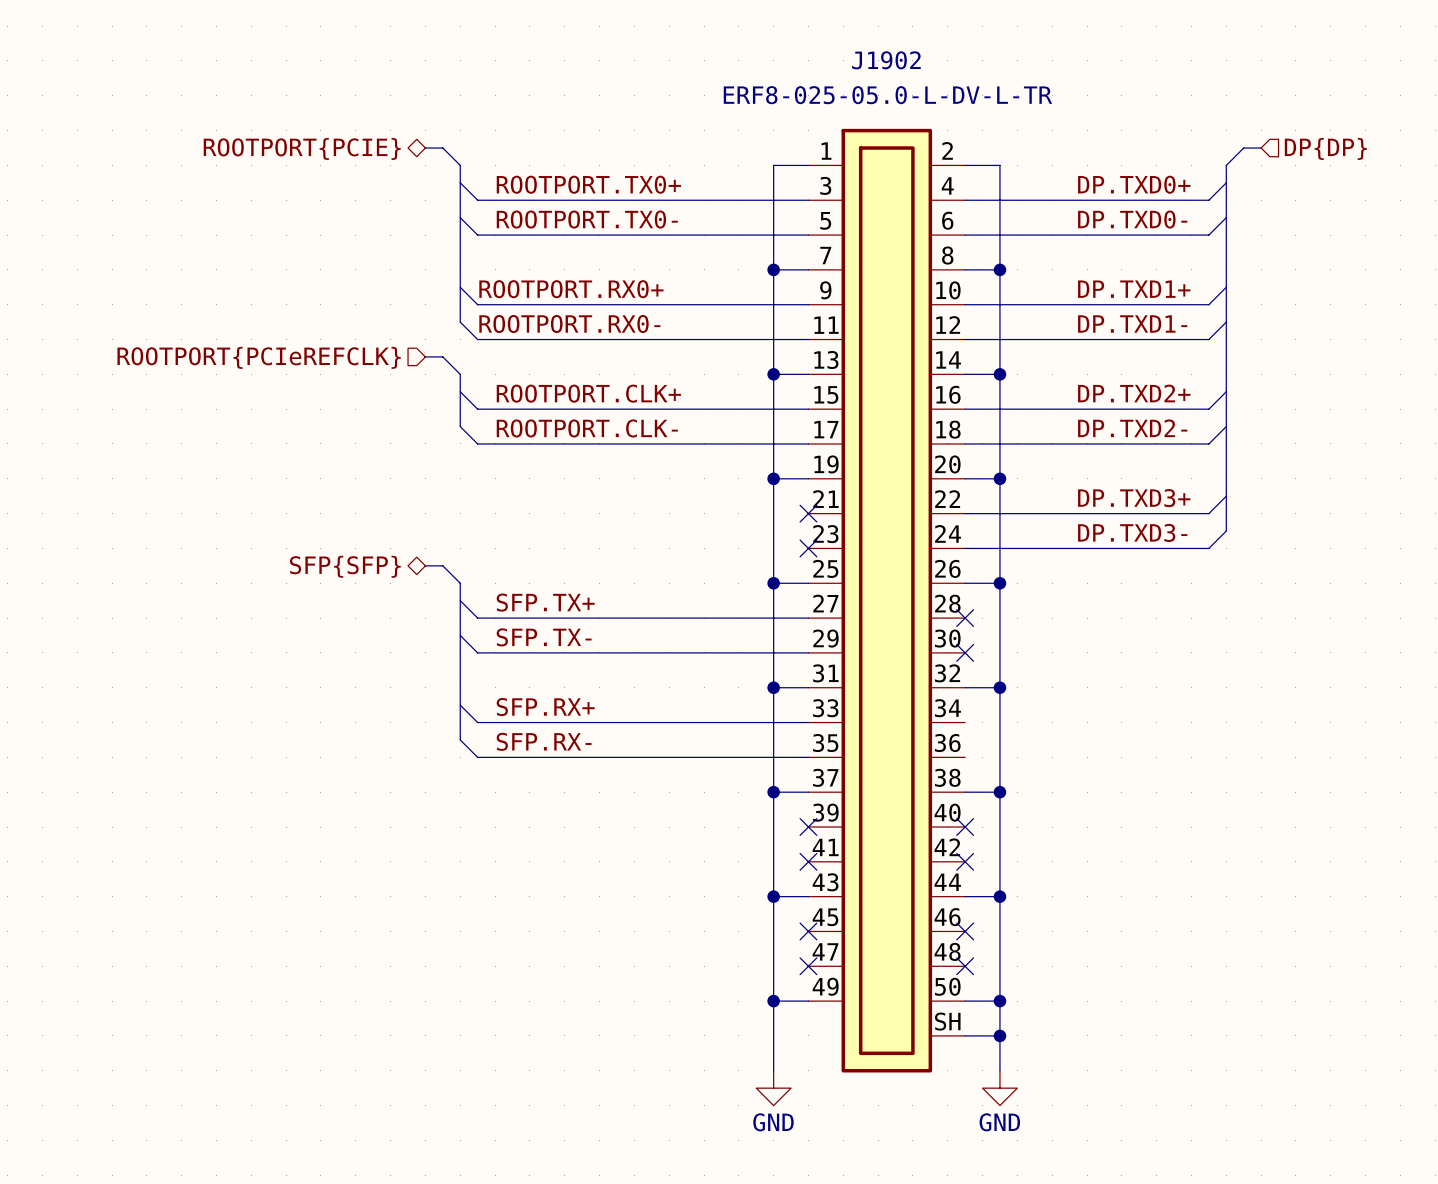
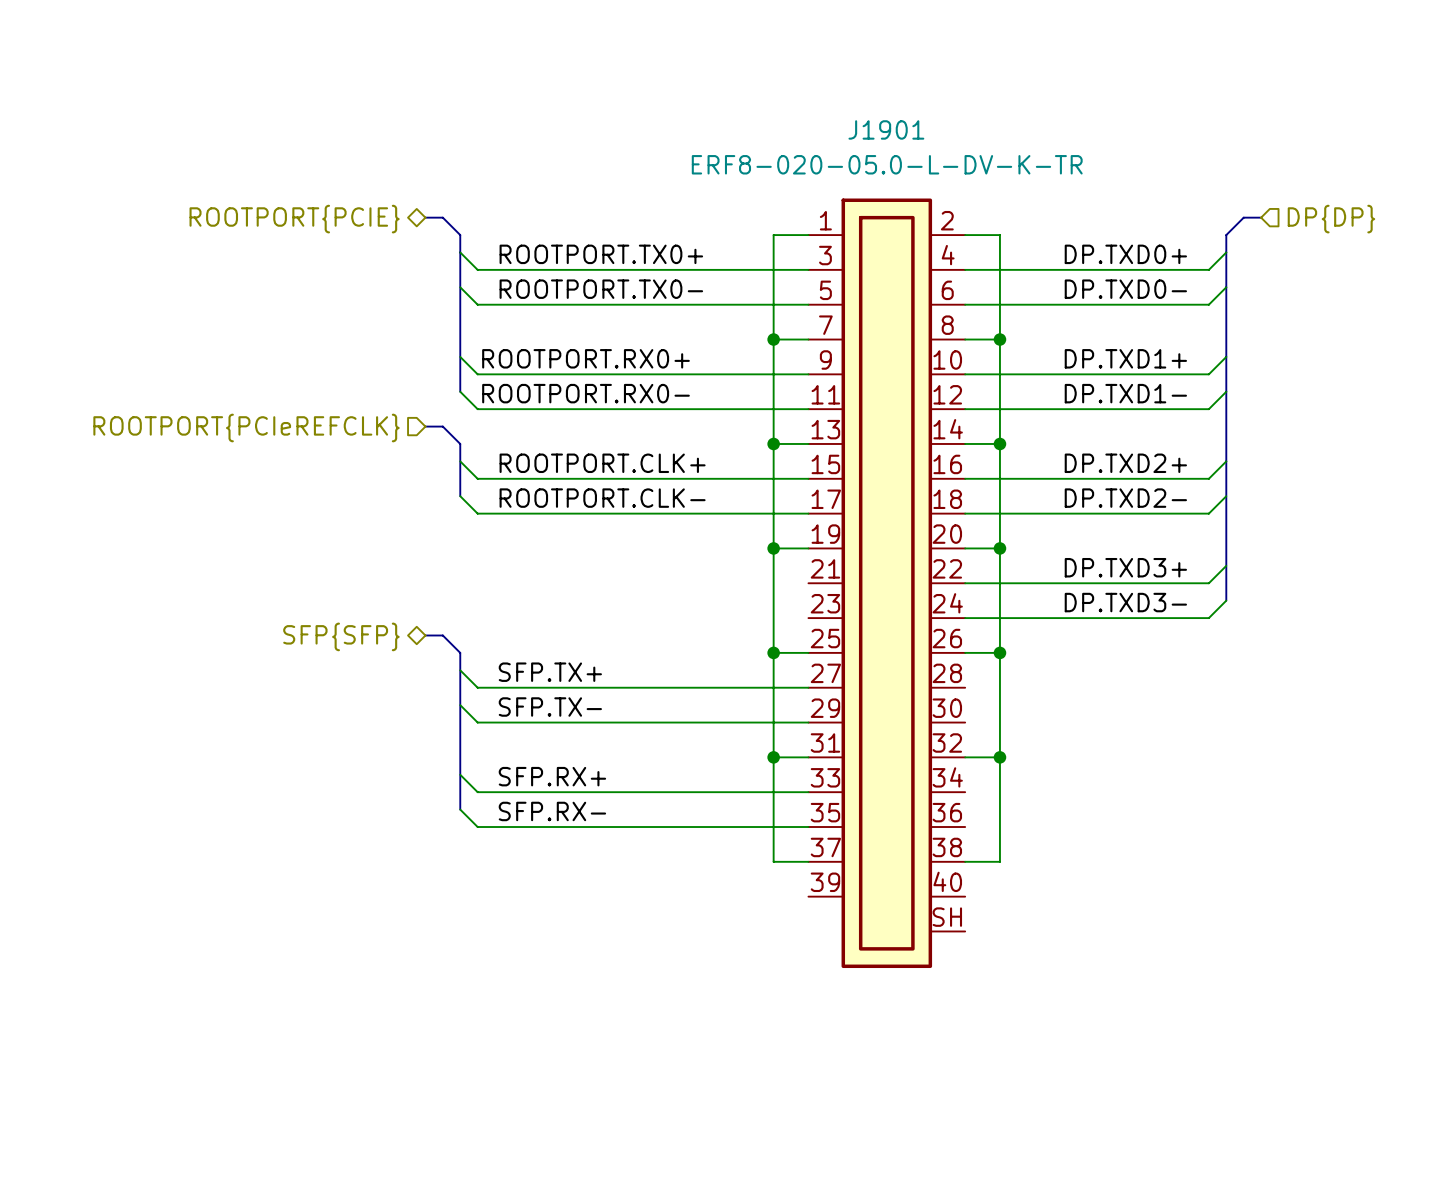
hierarchical label position: ROOTPORT{PCIE} (302, 148) -> ROOTPORT{PCIE} (294, 219)
bus: (425, 148) (442, 148) (460, 165) (460, 235) -> (425, 217) (442, 217) (460, 235)
bus: (1261, 148) (1243, 148) (1226, 165) (1226, 235) -> (1261, 217) (1243, 217) (1226, 235)
hierarchical label position: DP{DP} (1325, 148) -> DP{DP} (1331, 219)
wire: (808, 165) (773, 165) (773, 235) (477, 235) (460, 217) -> none
wire: (965, 165) (999, 165) (999, 235) (1208, 235) (1226, 217) -> none
wire: (460, 182) (477, 200) (808, 200) -> none
wire: (1226, 182) (1208, 200) (965, 200) -> none
label position: ROOTPORT.TX0+ (588, 184) -> ROOTPORT.TX0+ (601, 254)
label position: DP.TXD0+ (1134, 184) -> DP.TXD0+ (1125, 254)
label position: ROOTPORT.TX0- (587, 219) -> ROOTPORT.TX0- (601, 289)
label: DP.TXD0- (1132, 219) -> none
wire: none -> (460, 252) (477, 269) (773, 269)
wire: none -> (1226, 252) (1208, 269) (999, 269)
junction: (773, 269) -> none
junction: (999, 269) -> none
label position: ROOTPORT.RX0+ (571, 289) -> ROOTPORT.RX0+ (585, 358)
label: DP.TXD1+ (1134, 289) -> DP.TXD0- (1125, 289)
wire: (460, 322) (477, 339) (773, 339) -> (460, 356) (477, 374) (773, 374)
wire: (1226, 322) (1208, 339) (999, 339) -> (1226, 356) (1208, 374) (999, 374)
label: DP.TXD1- (1132, 323) -> DP.TXD1+ (1125, 358)
label position: ROOTPORT.RX0- (569, 324) -> ROOTPORT.RX0- (585, 393)
junction: none -> (773, 339)
junction: none -> (999, 339)
bus: (425, 356) (442, 356) (460, 374) -> (460, 322) (460, 374)
hierarchical label position: ROOTPORT{PCIeREFCLK} (259, 357) -> ROOTPORT{PCIeREFCLK} (246, 428)
junction: (773, 374) -> none
junction: (999, 374) -> none
bus: (460, 391) (460, 426) -> none
label position: ROOTPORT.CLK+ (588, 393) -> ROOTPORT.CLK+ (602, 463)
label: DP.TXD2+ (1134, 393) -> DP.TXD1- (1125, 393)
bus: none -> (425, 426) (442, 426) (460, 443) (460, 496)
wire: (460, 426) (477, 443) (773, 443) -> (460, 461) (477, 478) (773, 478)
wire: (1226, 426) (1208, 443) (999, 443) -> (1226, 461) (1208, 478) (999, 478)
label position: ROOTPORT.CLK- (587, 428) -> ROOTPORT.CLK- (602, 498)
label: DP.TXD2- (1132, 428) -> DP.TXD2+ (1125, 463)
junction: none -> (773, 443)
junction: none -> (999, 443)
junction: (773, 478) -> none
junction: (999, 478) -> none
label: DP.TXD3+ (1134, 498) -> DP.TXD2- (1125, 498)
no-connect mark: (808, 513) -> none
wire: (1226, 531) (1208, 548) (999, 548) -> (1226, 565) (1208, 583) (999, 583)
bus: none -> (1226, 531) (1226, 600)
label position: DP.TXD3- (1132, 532) -> DP.TXD3- (1125, 602)
junction: none -> (773, 548)
no-connect mark: (808, 548) -> none
junction: none -> (999, 548)
bus: (425, 565) (442, 565) (460, 583) (460, 652) -> (425, 635) (442, 635) (460, 652)
hierarchical label position: SFP{SFP} (345, 566) -> SFP{SFP} (341, 636)
label: none -> DP.TXD3+ (1125, 567)
wire: (773, 583) (808, 583) -> (773, 548) (808, 548)
junction: (773, 583) -> none
J1901: none -> (886, 583)
junction: (999, 583) -> none
wire: (460, 600) (477, 618) (808, 618) -> (460, 496) (477, 513) (808, 513)
J1902: (886, 600) -> none
wire: none -> (1226, 600) (1208, 618) (965, 618)
label position: SFP.TX+ (545, 602) -> SFP.TX+ (550, 672)
no-connect mark: (965, 618) -> none
wire: (460, 635) (477, 652) (773, 652) -> (460, 670) (477, 687) (773, 687)
label: SFP.TX- (544, 637) -> none
junction: none -> (773, 652)
no-connect mark: (965, 652) -> none
junction: none -> (999, 652)
junction: (773, 687) -> none
wire: (965, 687) (999, 687) -> (965, 652) (999, 652)
junction: (999, 687) -> none
label: SFP.RX+ (545, 707) -> SFP.TX- (550, 707)
wire: (460, 739) (477, 757) (773, 757) -> (460, 774) (477, 792) (773, 792)
bus: none -> (460, 739) (460, 809)
label position: SFP.RX- (544, 741) -> SFP.RX- (552, 811)
junction: none -> (773, 757)
junction: none -> (999, 757)
label: none -> SFP.RX+ (552, 776)
junction: (773, 792) -> none
wire: (965, 792) (999, 792) -> (965, 757) (999, 757)
junction: (999, 792) -> none
wire: none -> (460, 809) (477, 827) (808, 827)
no-connect mark: (808, 827) -> none
no-connect mark: (965, 827) -> none
wire: (773, 861) (773, 1070) -> (773, 861) (808, 861)
no-connect mark: (808, 861) -> none
no-connect mark: (965, 861) -> none
wire: (999, 861) (999, 1070) -> (999, 861) (965, 861)
wire: (773, 896) (808, 896) -> none
junction: (773, 896) -> none
wire: (965, 896) (999, 896) -> none
junction: (999, 896) -> none
no-connect mark: (808, 931) -> none
no-connect mark: (965, 931) -> none
no-connect mark: (808, 966) -> none
no-connect mark: (965, 966) -> none
wire: (773, 1001) (808, 1001) -> none
junction: (773, 1001) -> none
wire: (965, 1001) (999, 1001) -> none
junction: (999, 1001) -> none
wire: (965, 1035) (999, 1035) -> none
junction: (999, 1035) -> none
power symbol: GND (773, 1088) -> none
power symbol: GND (999, 1088) -> none

